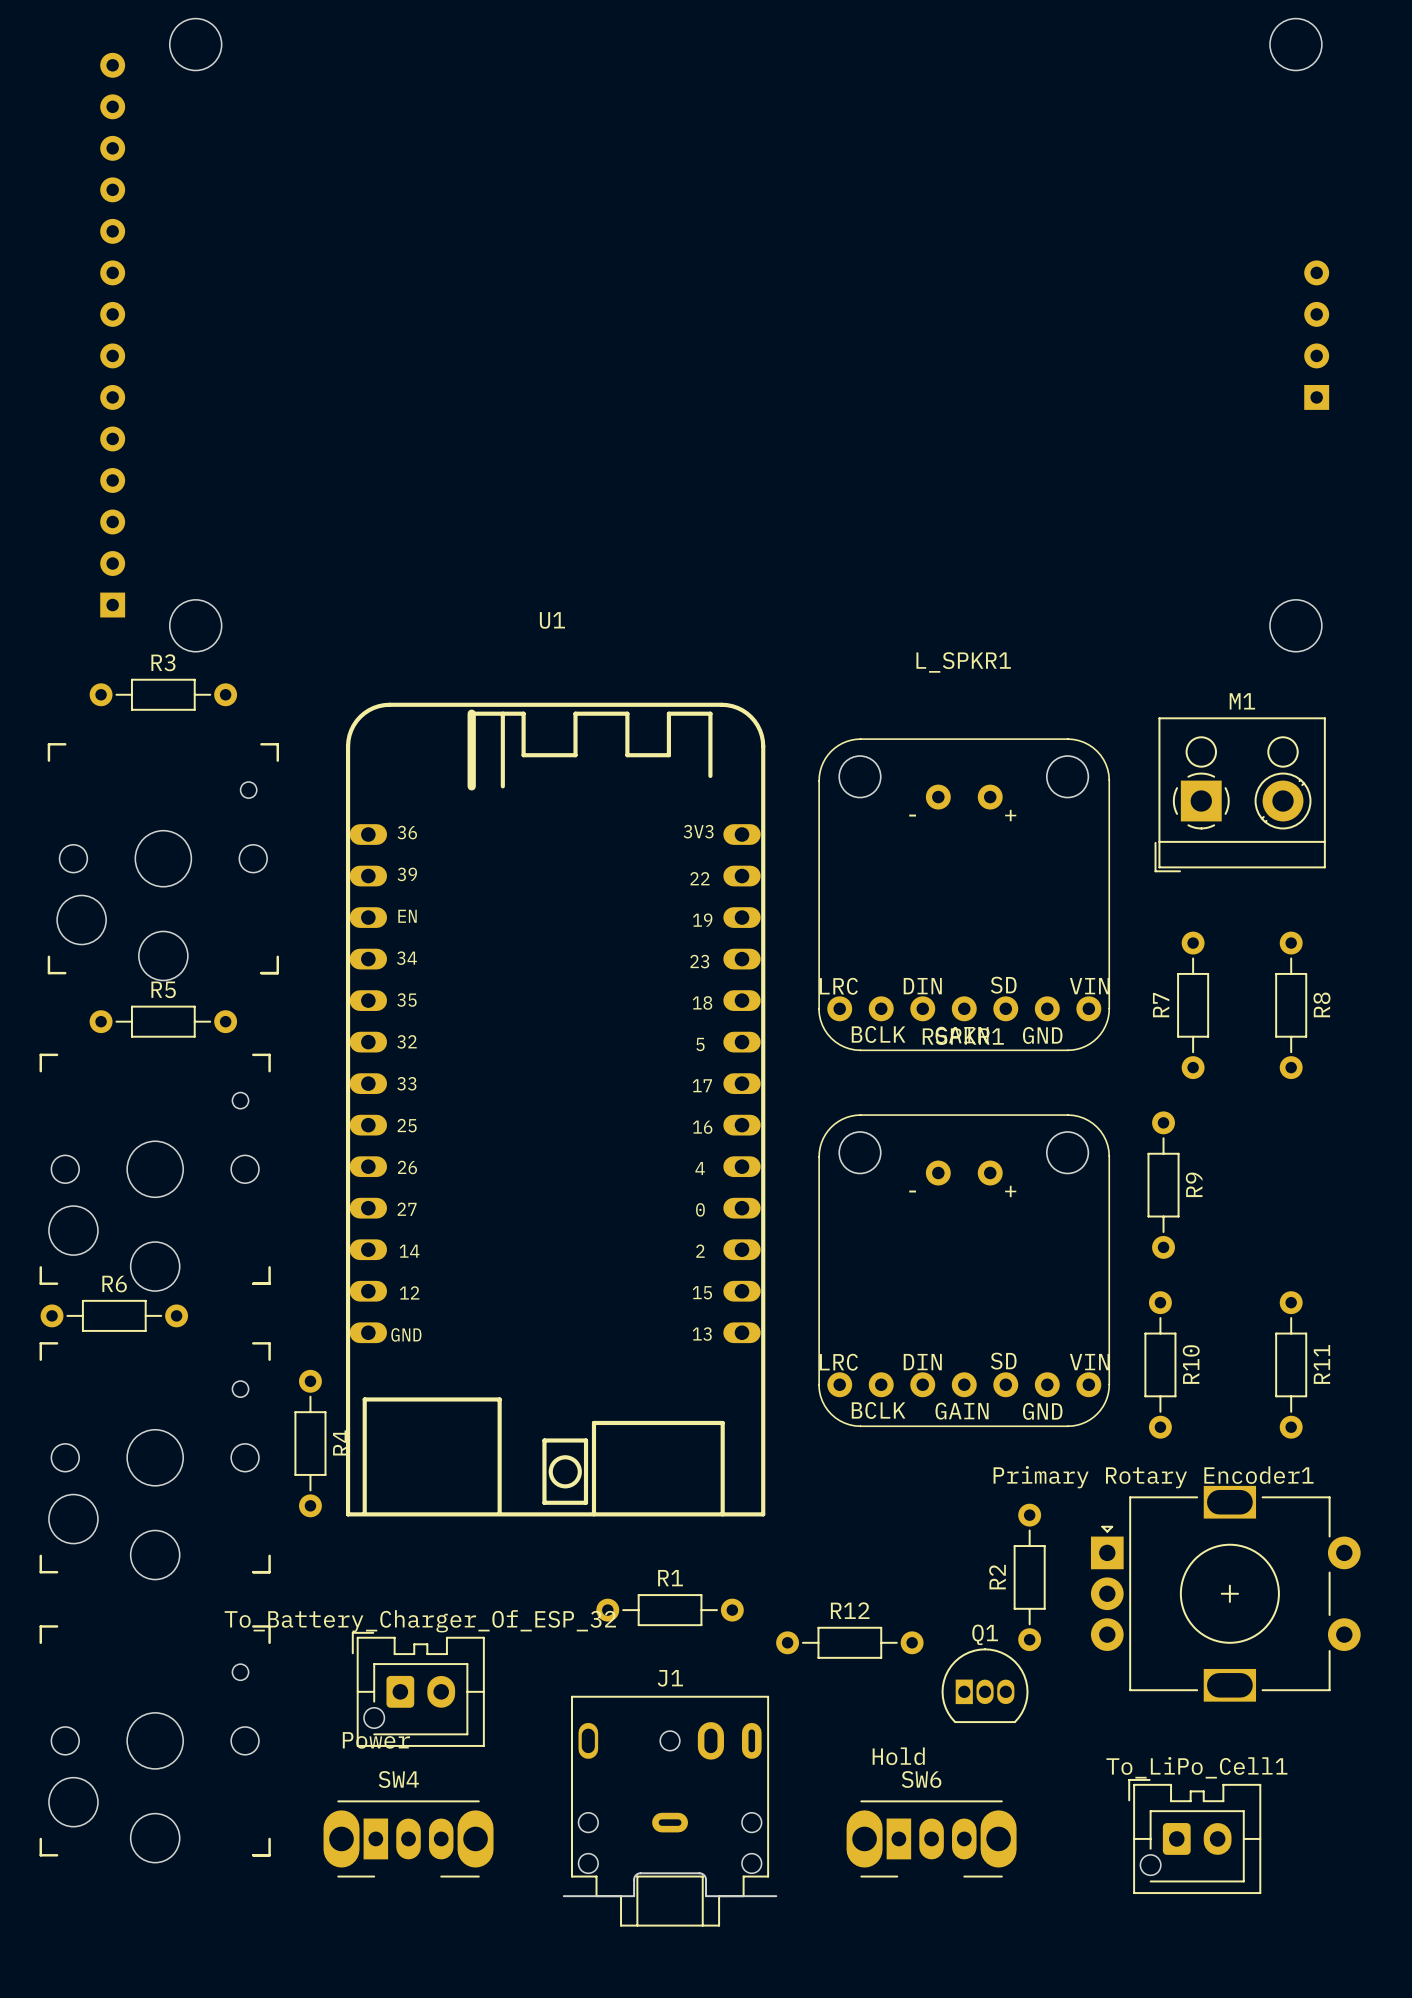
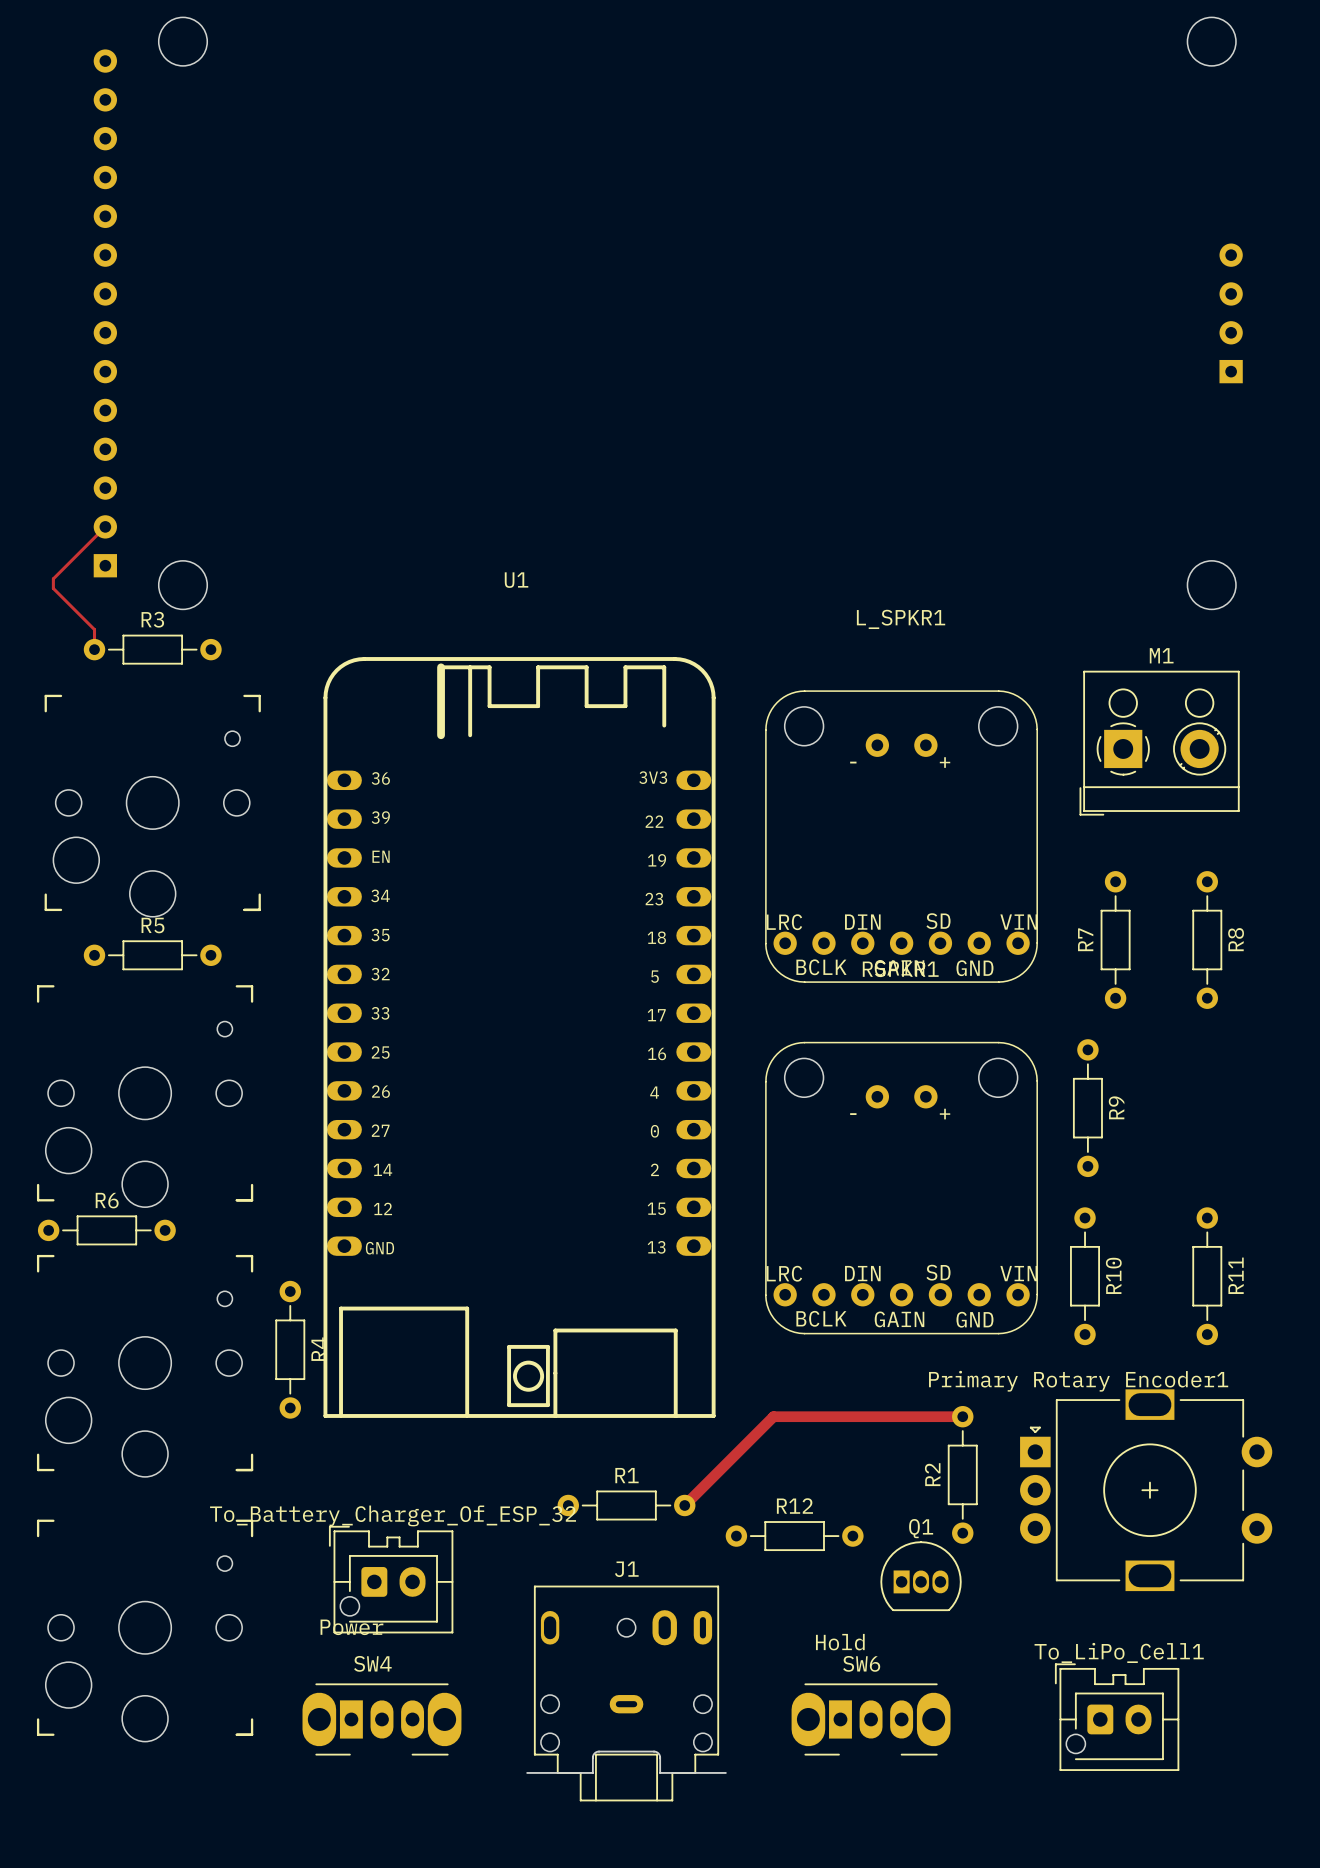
track: none -> (105, 526) (53, 578) (53, 588) (94, 629) (94, 649)
track: none -> (962, 1416) (773, 1416) (684, 1505)

